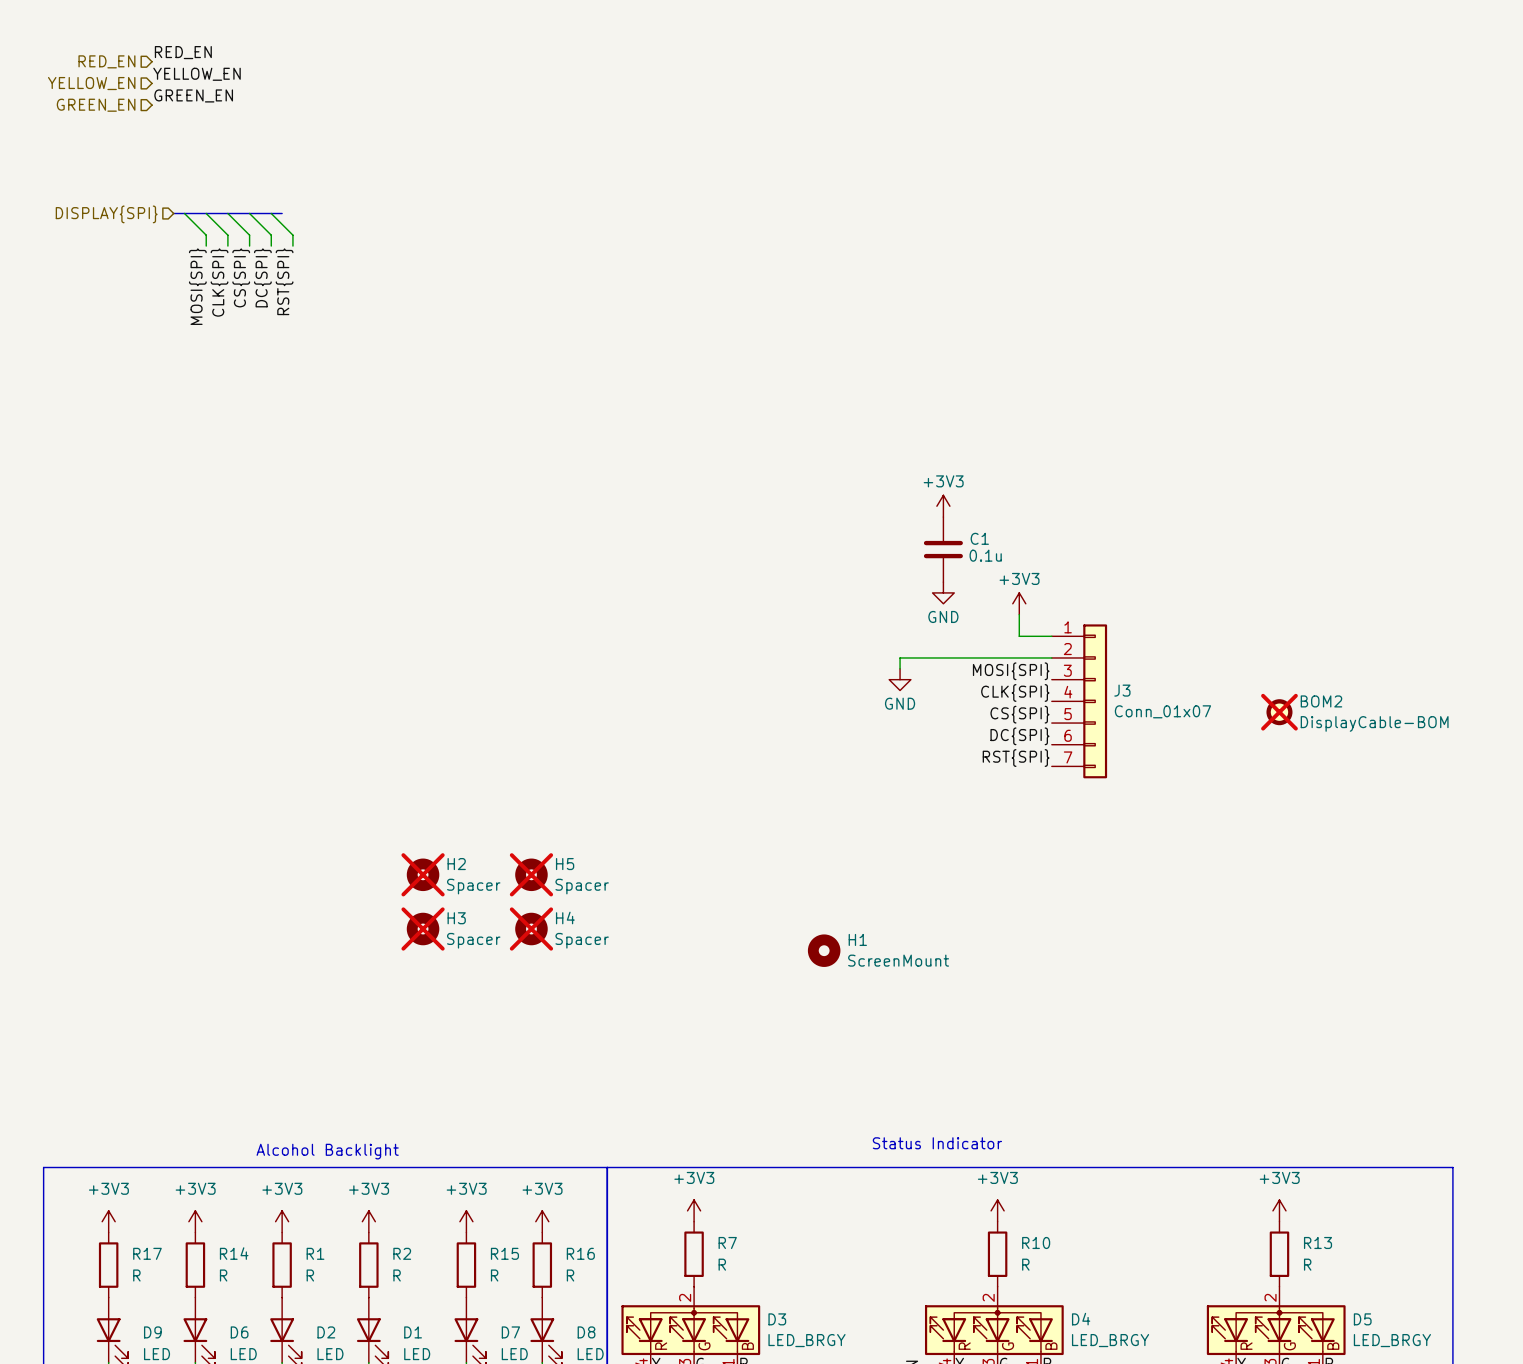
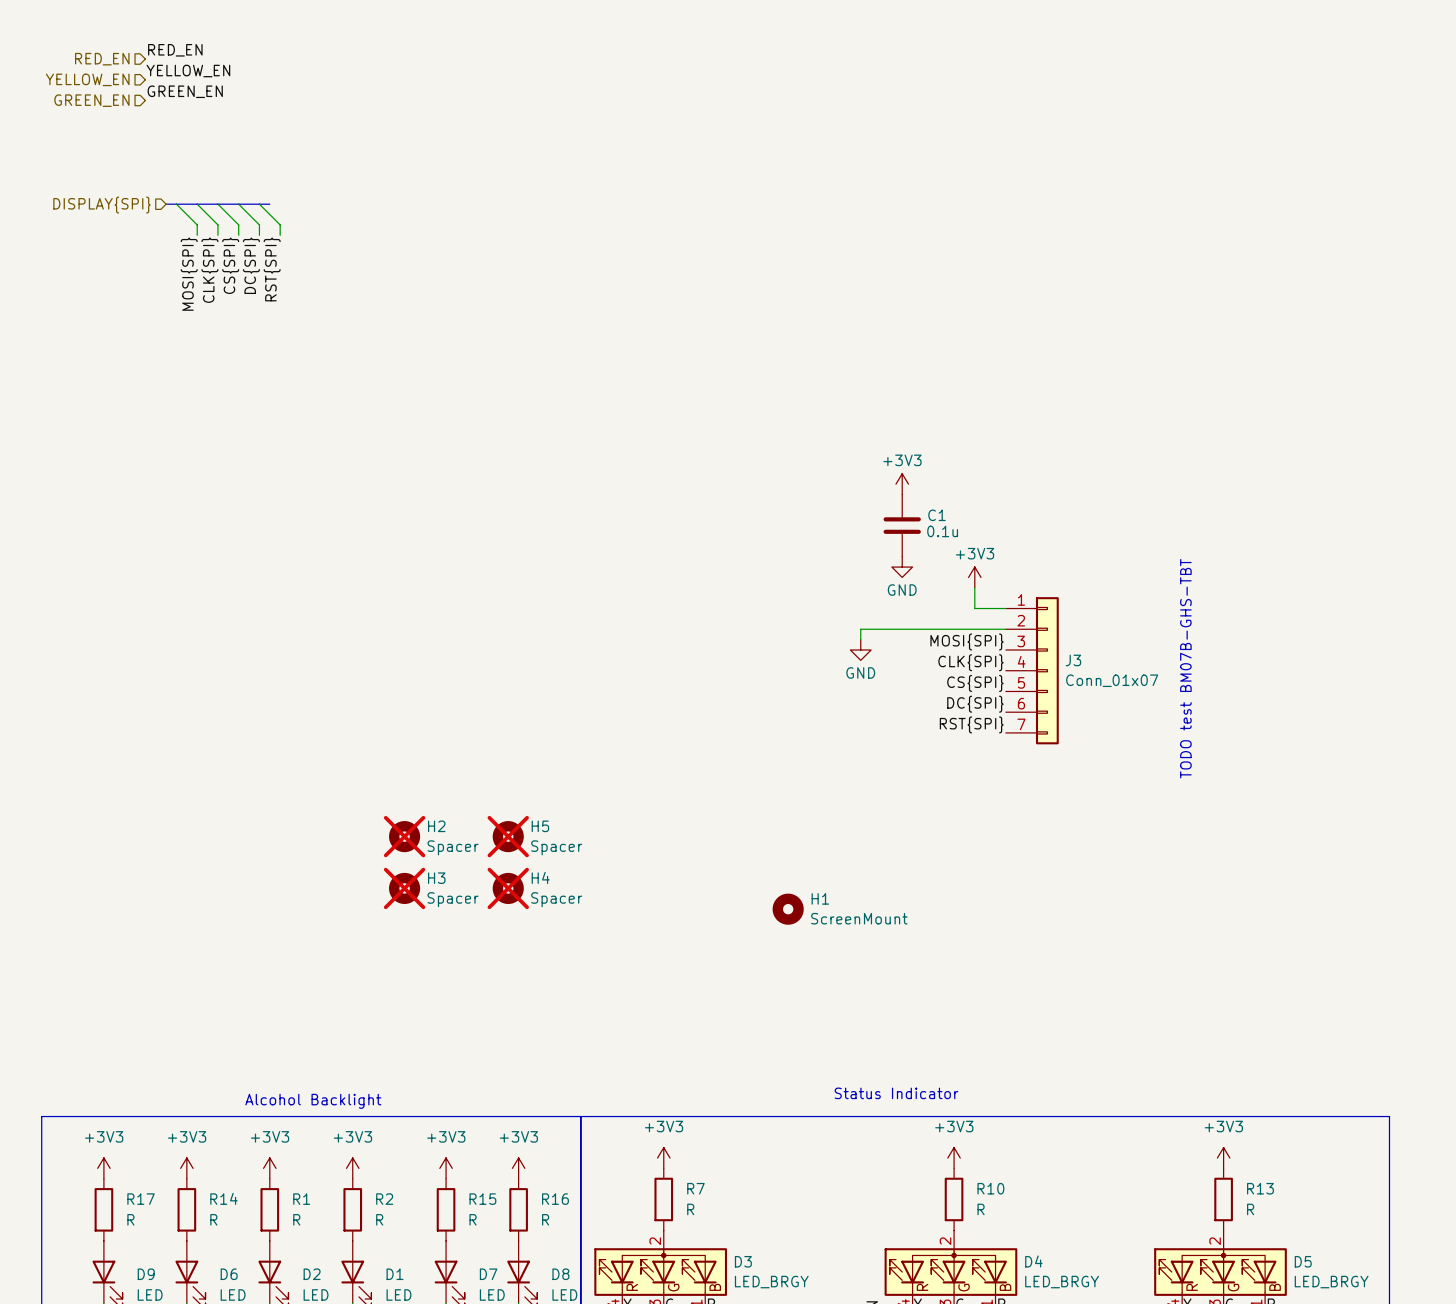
text: none -> TODO test BM07B-GHS-TBT (1185, 668)
BOM2: DisplayCable-BOM (1279, 712) -> none

